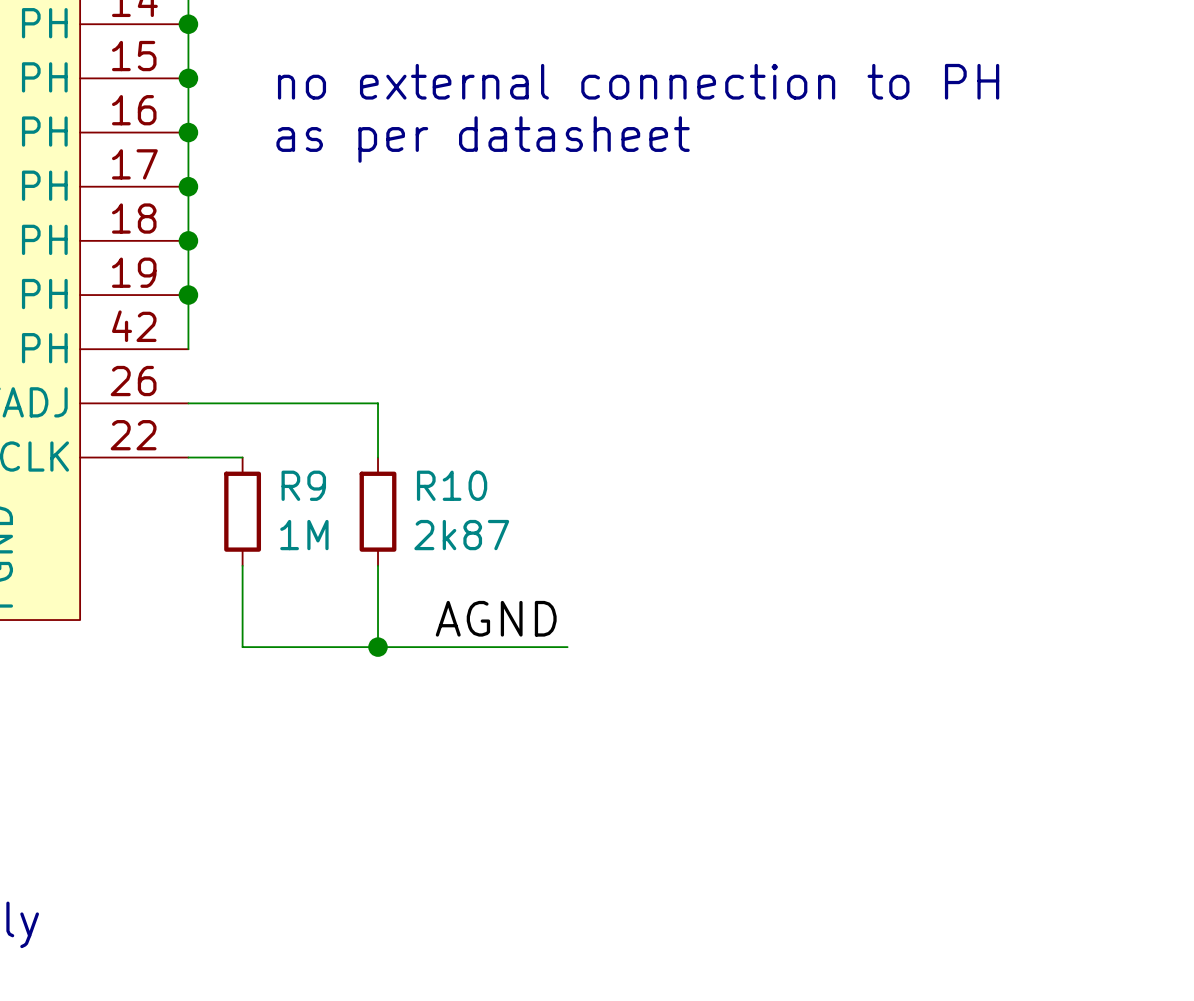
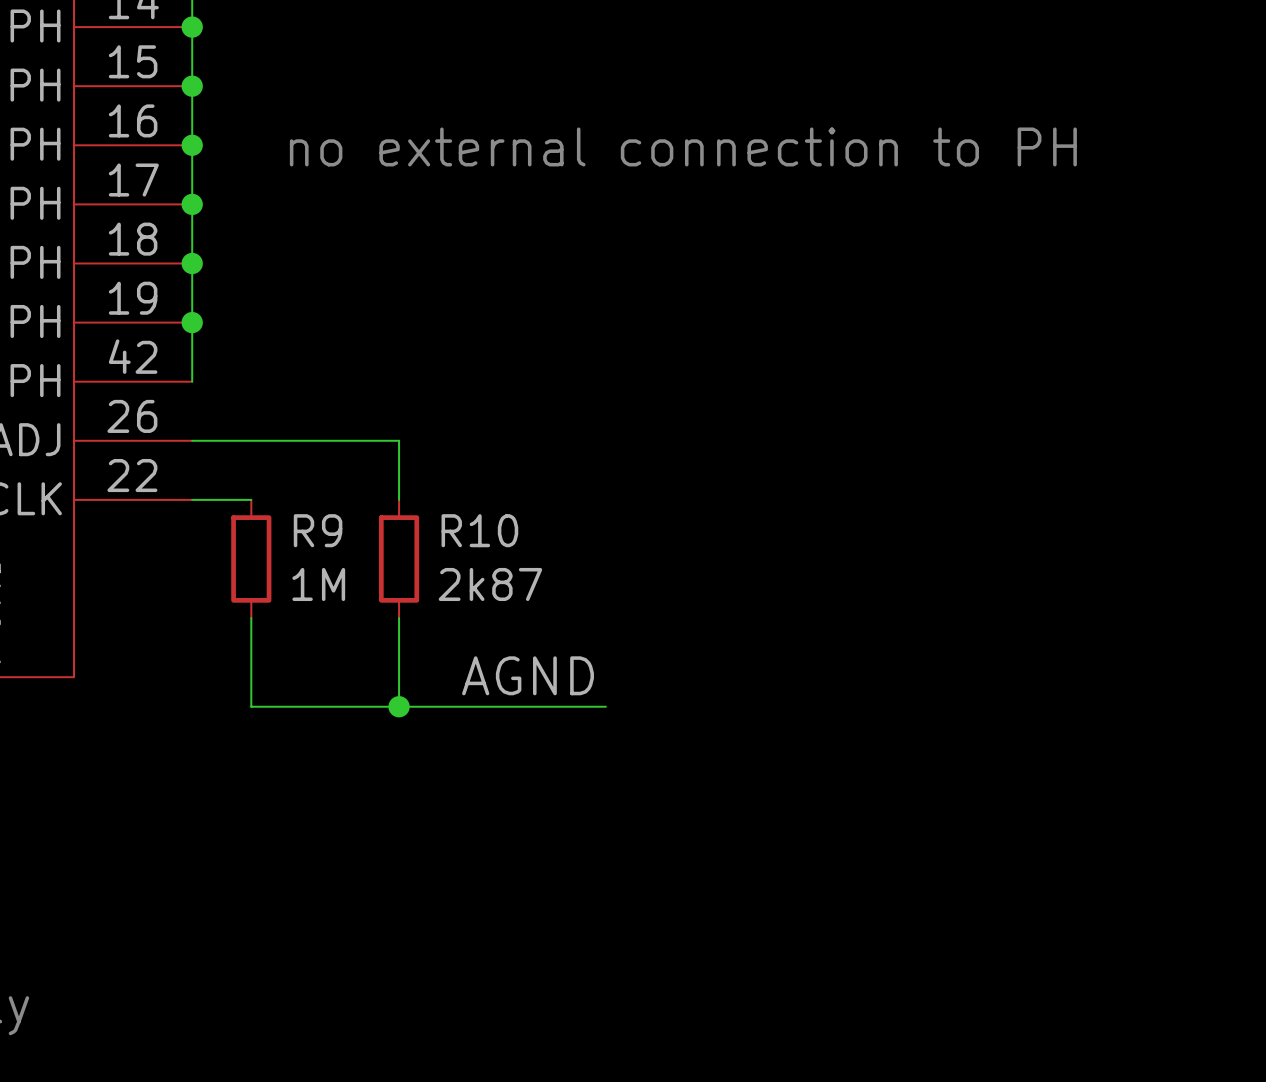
text: no external connection to PH (638, 81) -> none
text: as per datasheet (483, 139) -> no external connection to PH (683, 146)

